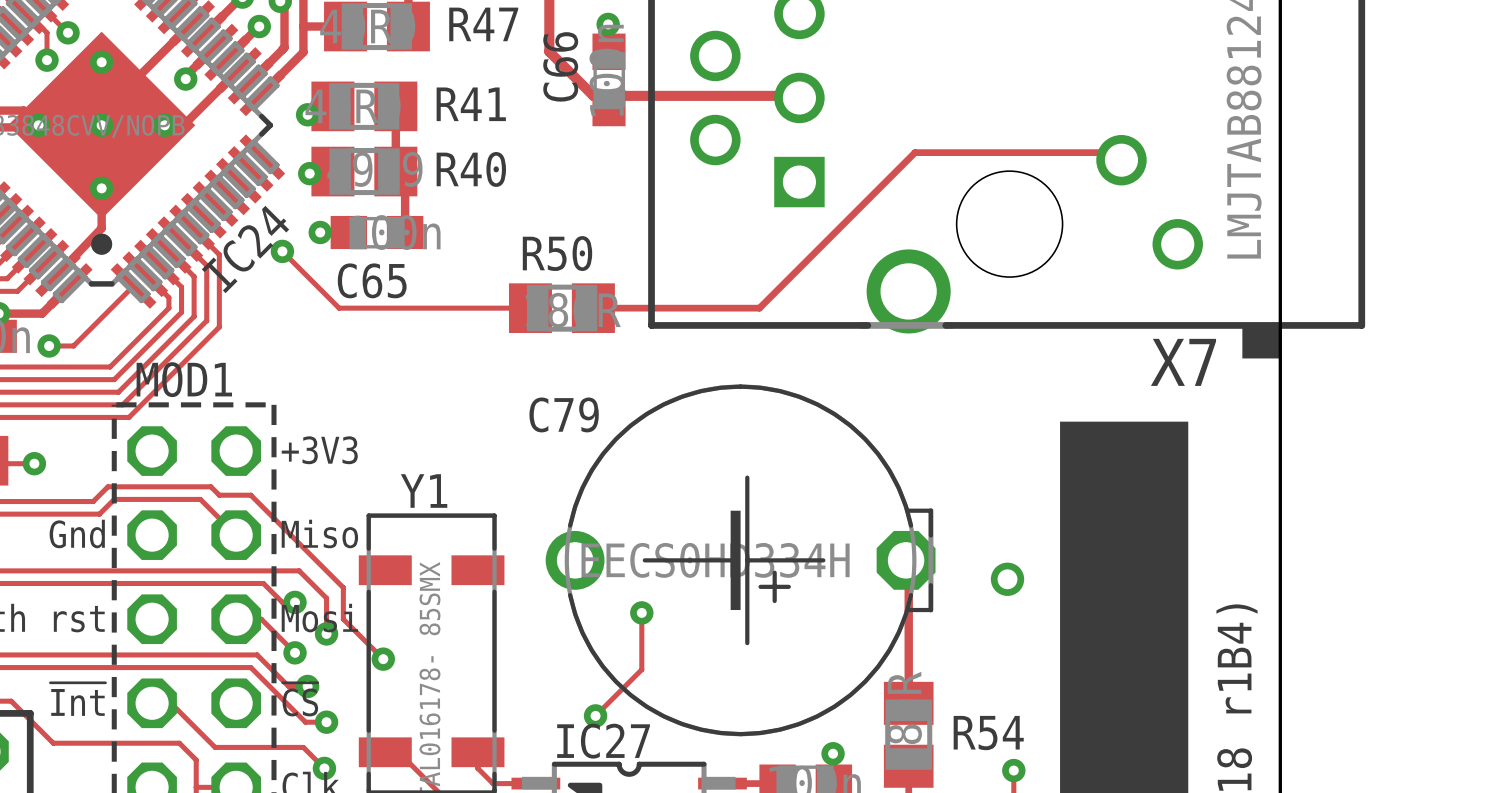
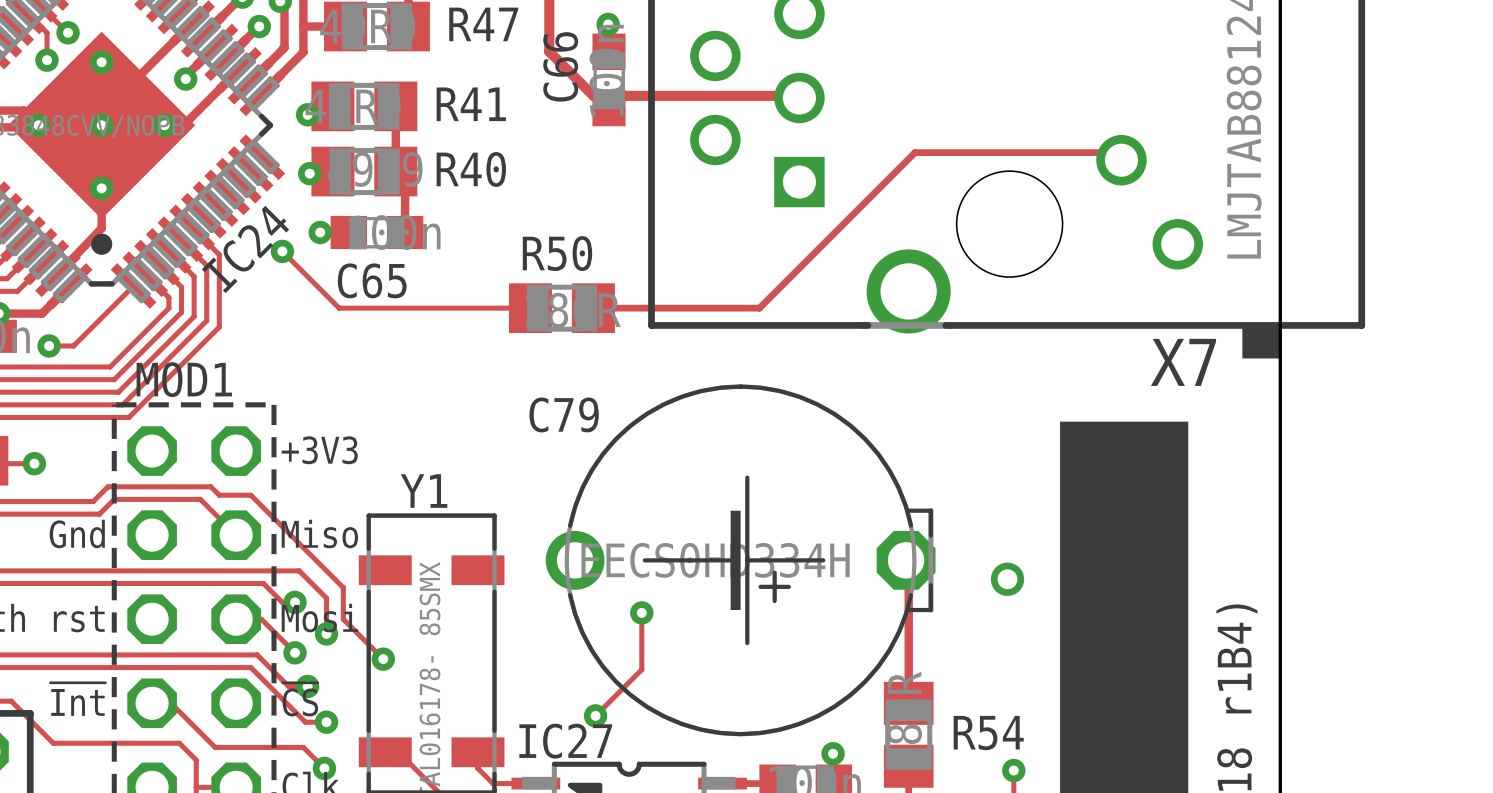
IC27 name position: IC27 (603, 741) -> IC27 (565, 741)

